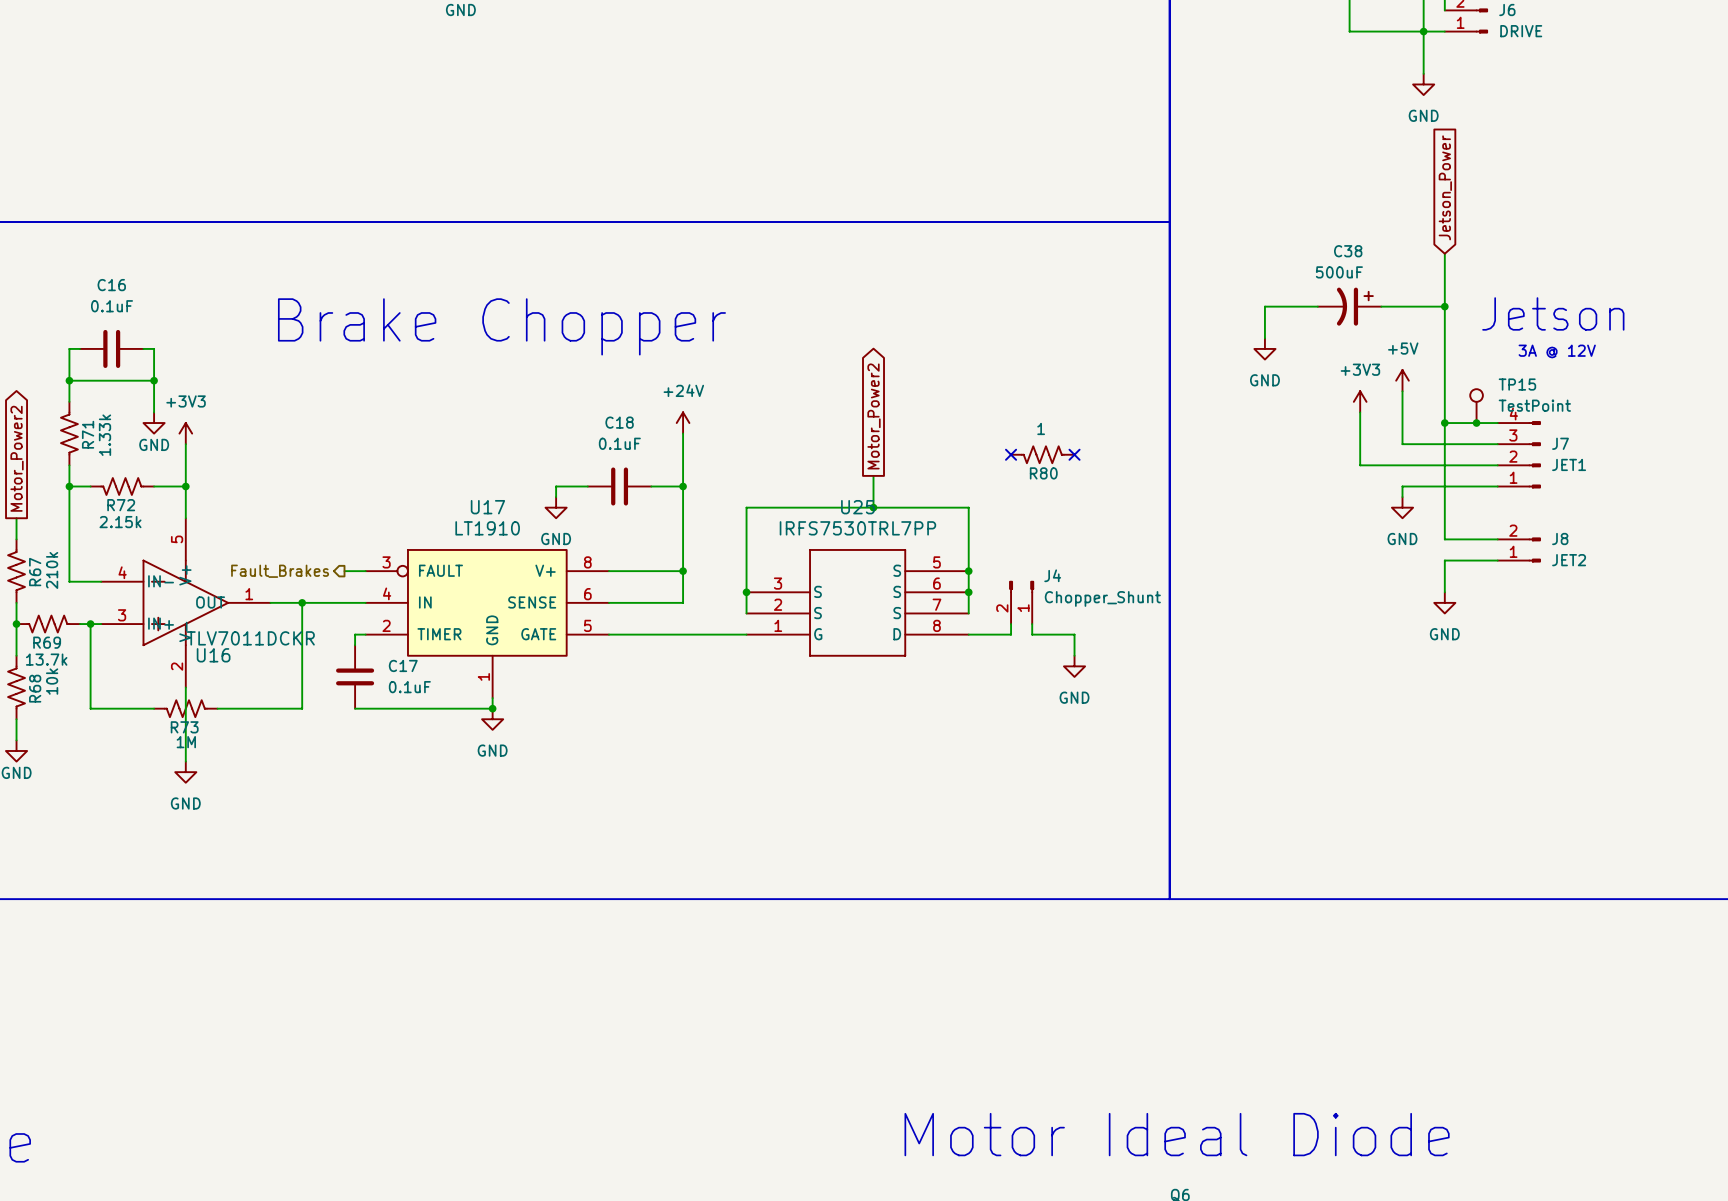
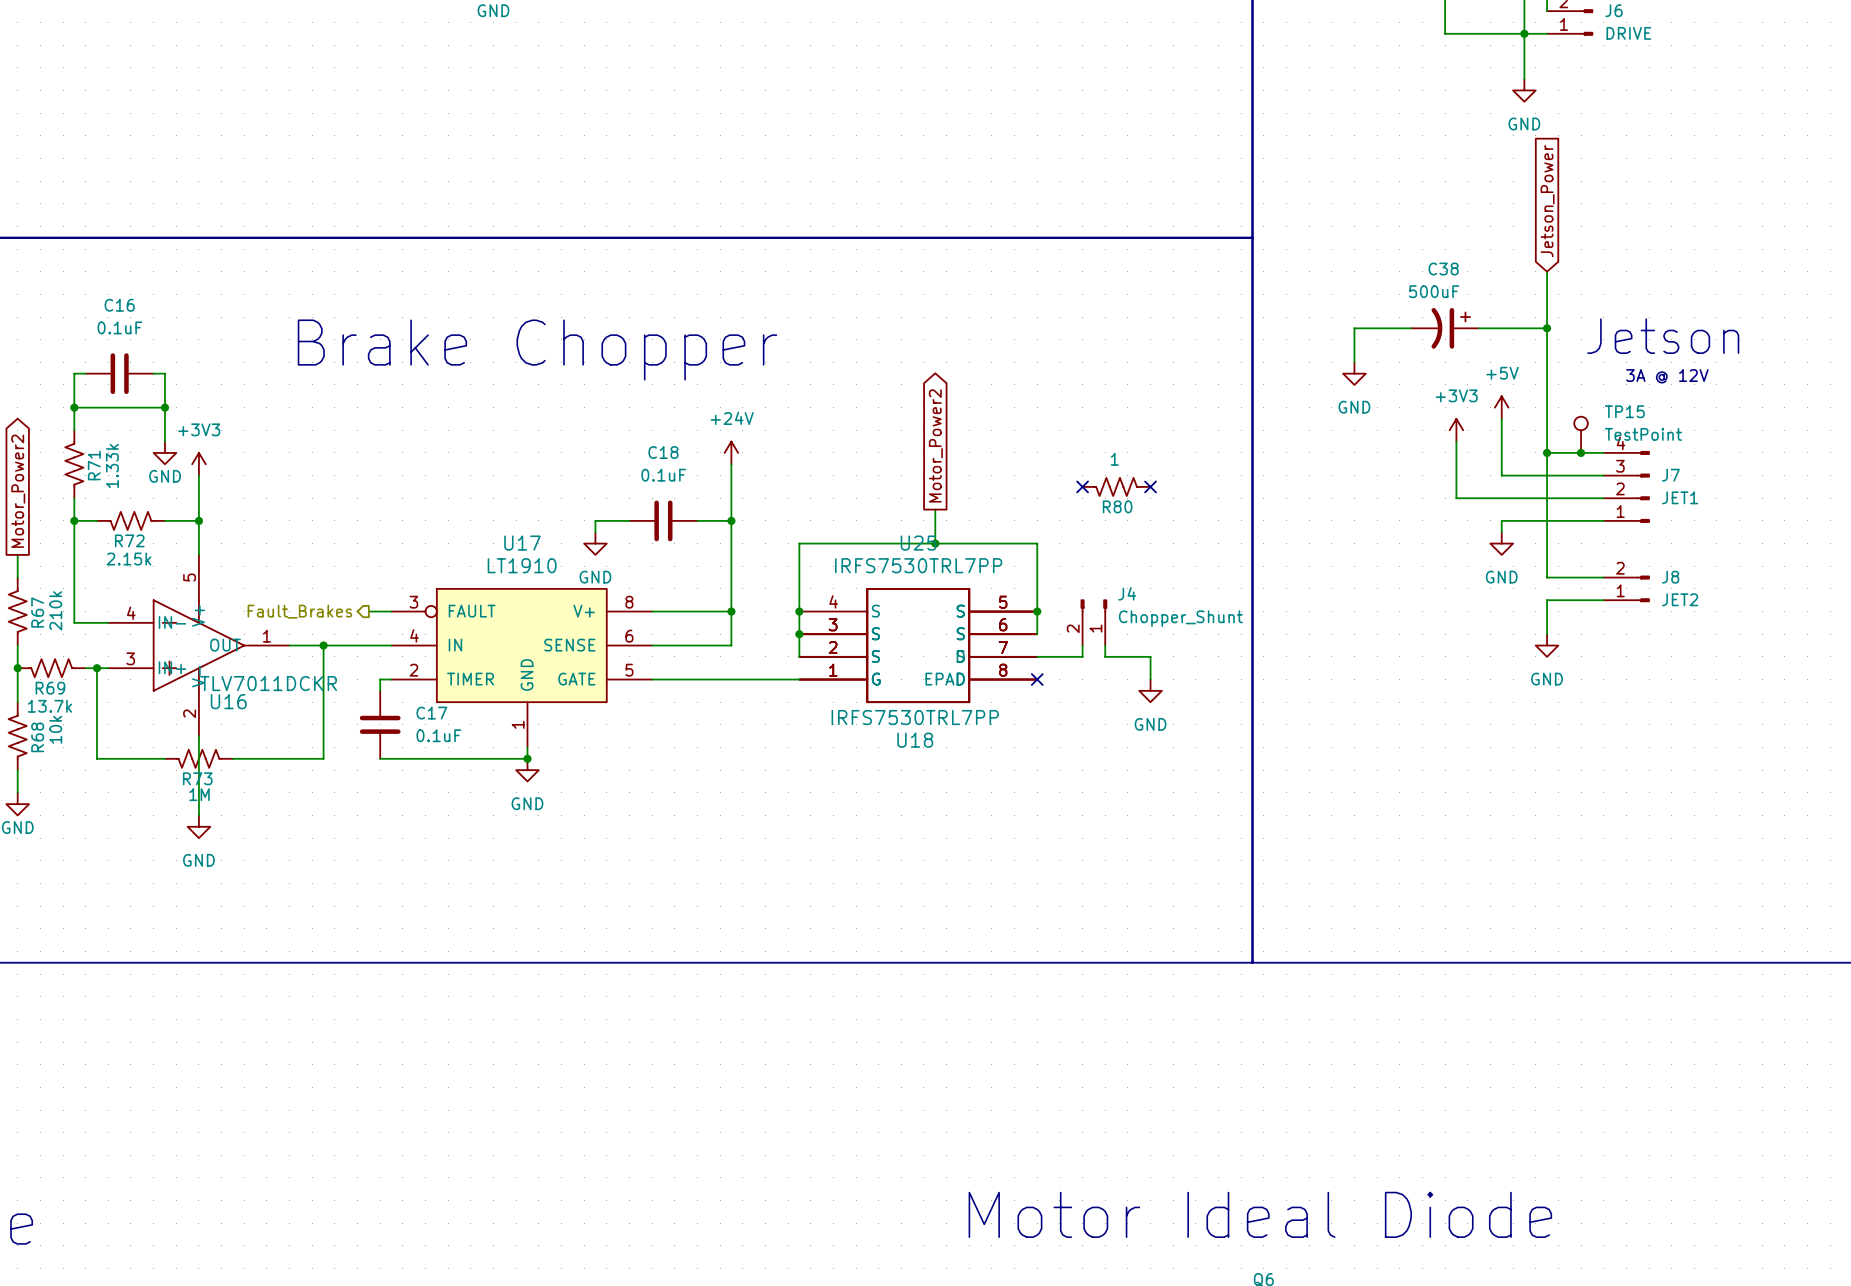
junction: none -> (799, 611)
wire: (968, 592) (968, 613) -> (1082, 645) (1082, 656) (1037, 656)
junction: (968, 592) -> none
U18: none -> IRFS7530TRL7PP (918, 645)
J4 position: (1021, 602) -> (1093, 622)
wire: (1011, 624) (1011, 634) (968, 634) -> none
wire: (1032, 624) (1032, 634) (1074, 634) (1074, 655) -> (1105, 645) (1105, 656) (1150, 656) (1150, 679)
no-connect mark: none -> (1037, 679)
power symbol position: GND (1074, 666) -> GND (1150, 690)

